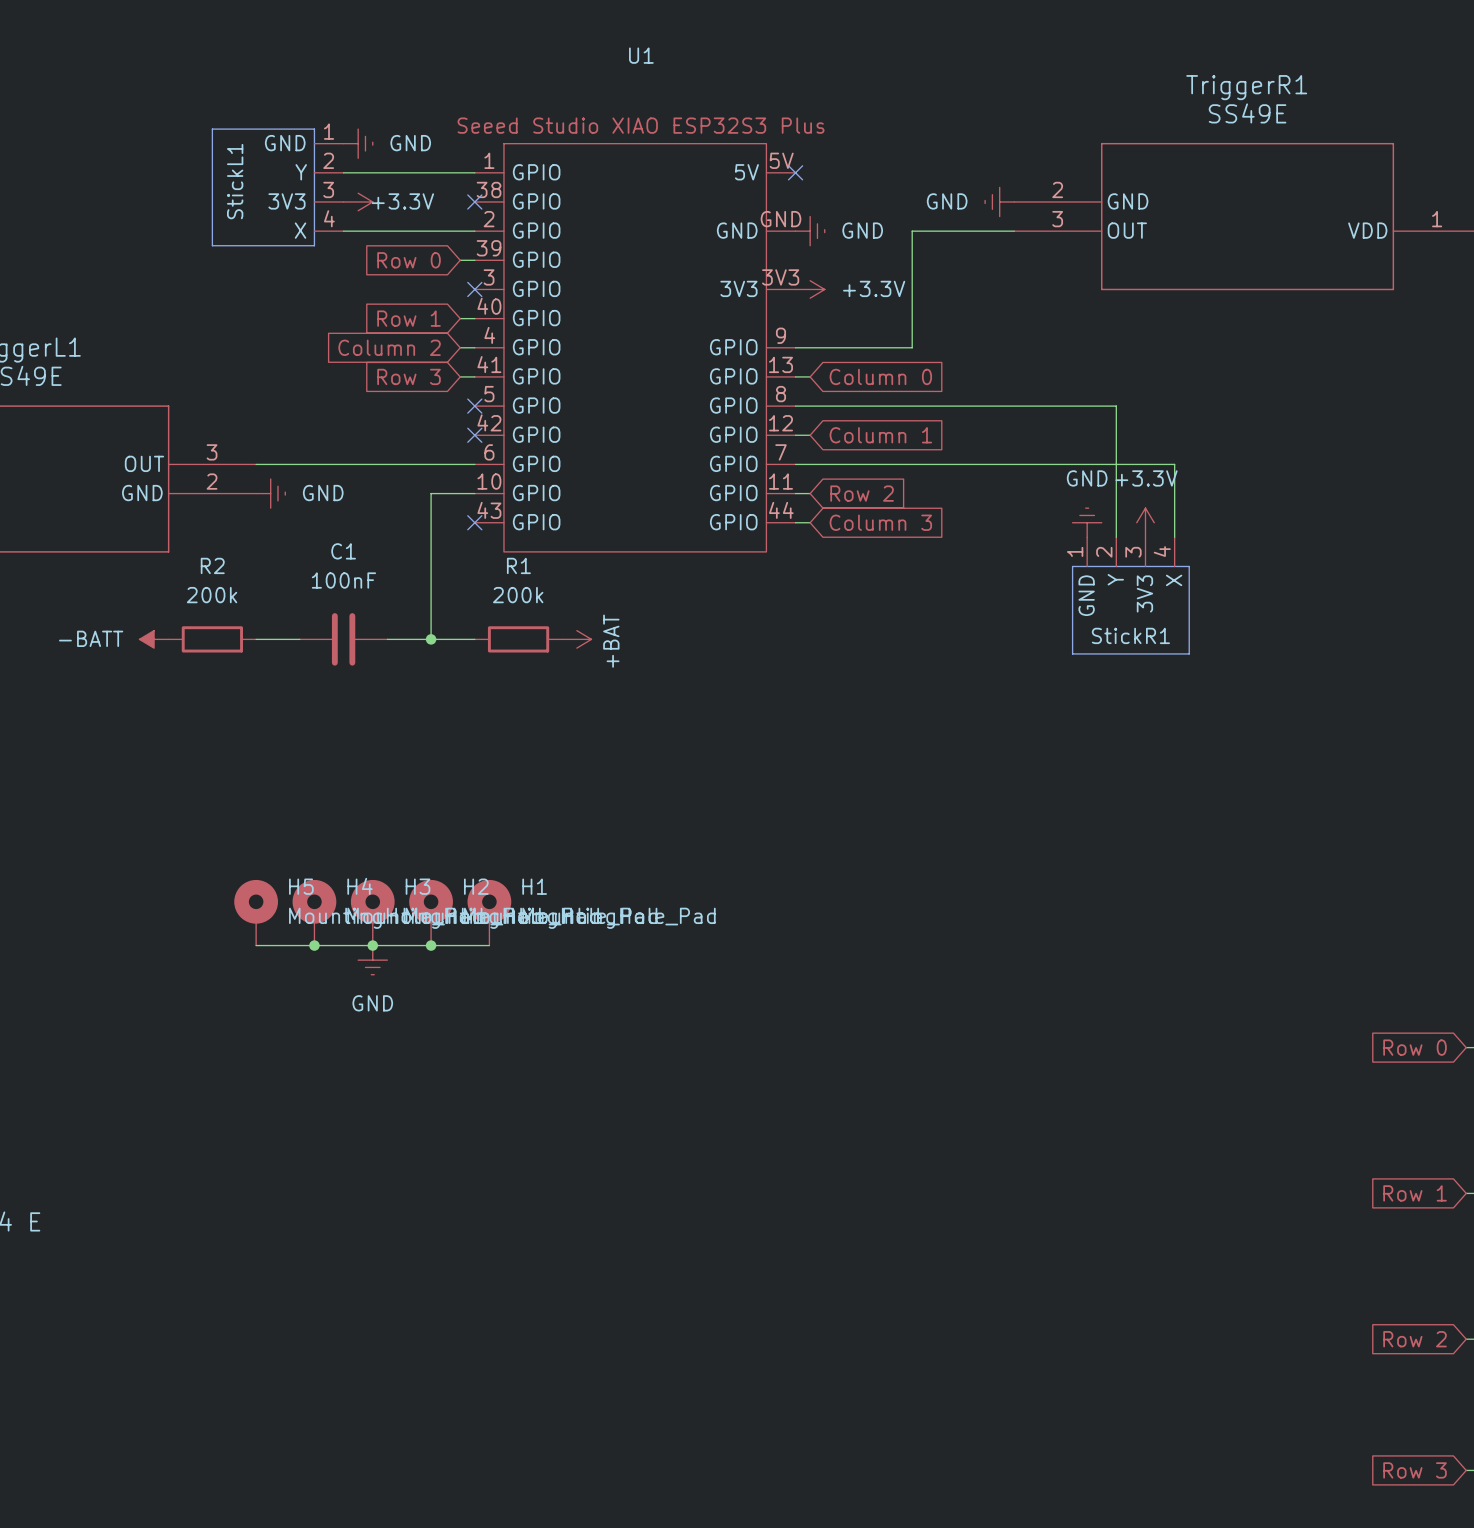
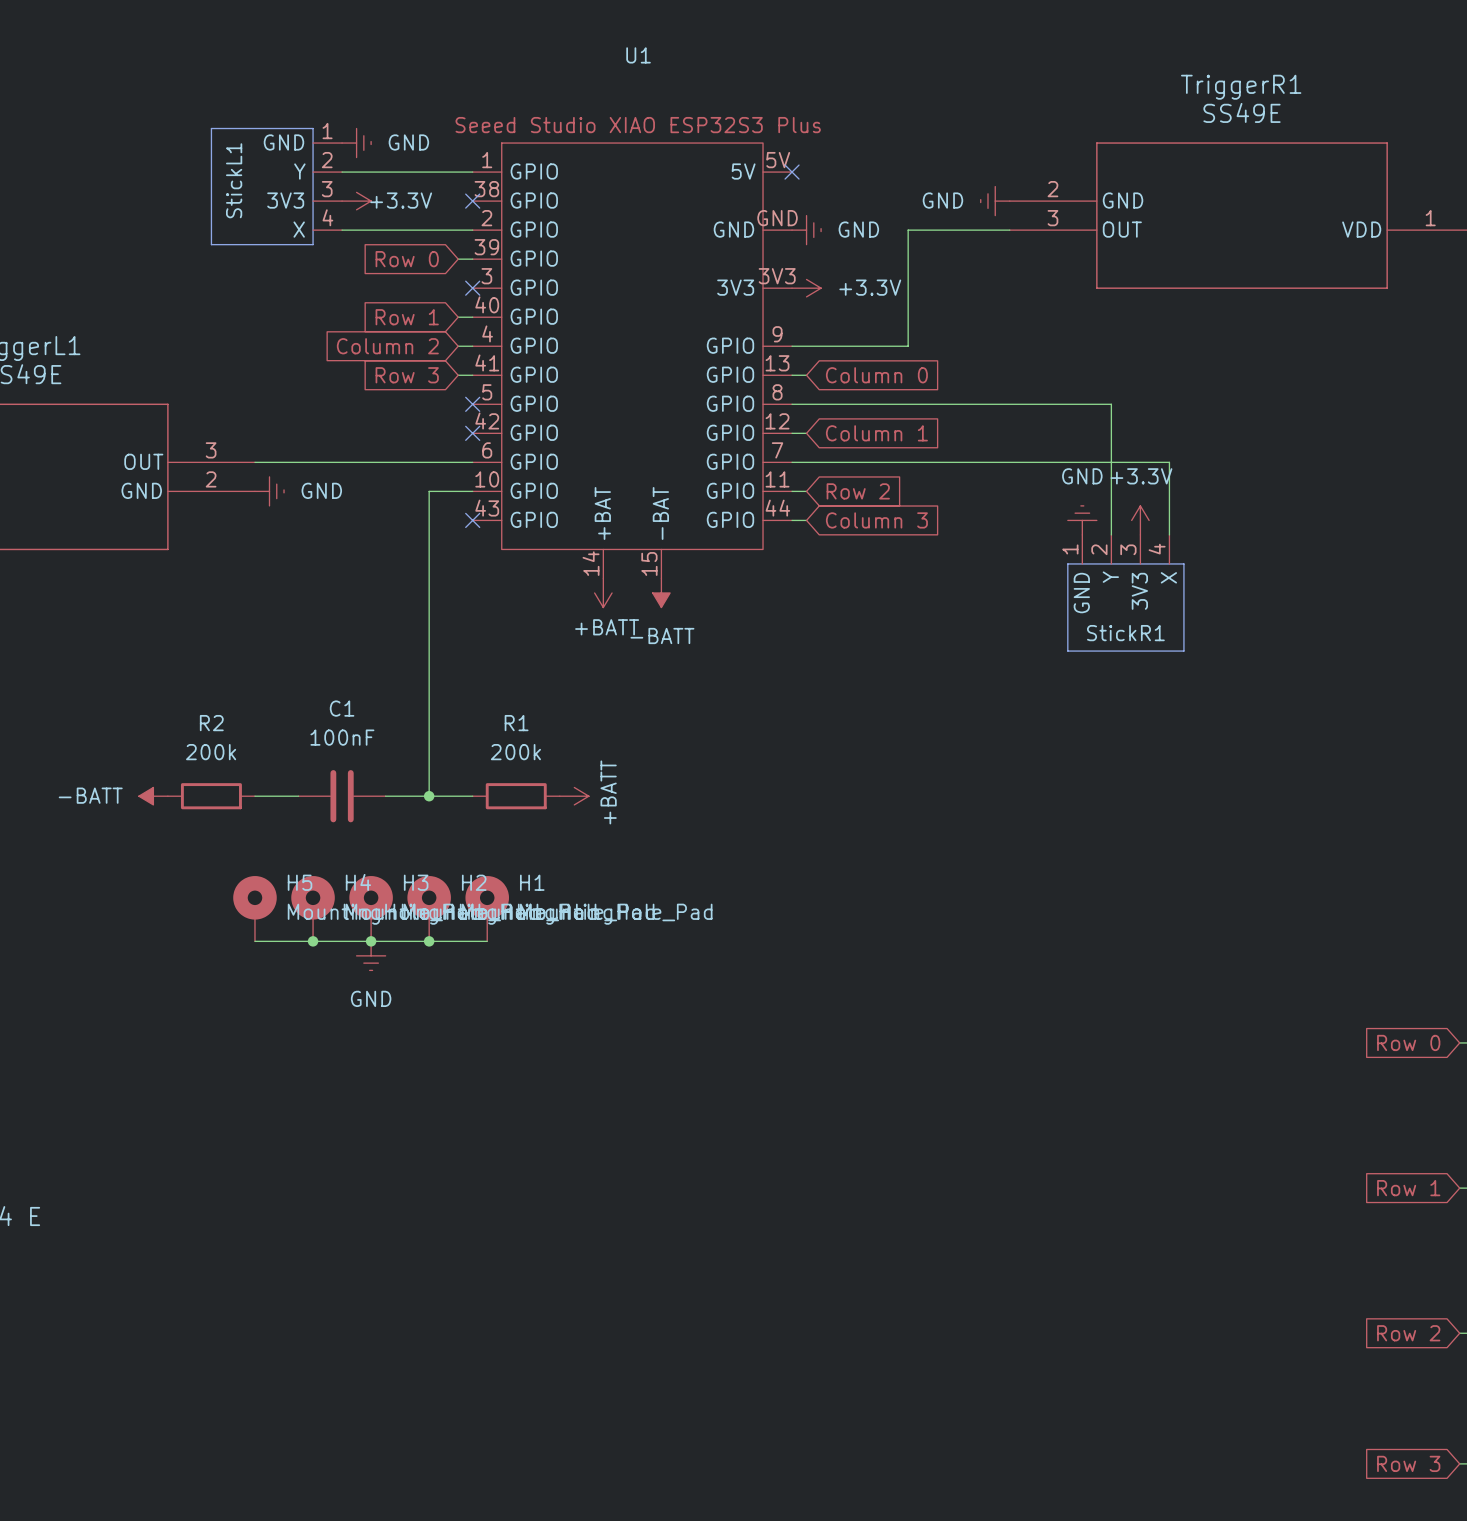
U1 symbol: [474, 143, 796, 552] -> [472, 143, 793, 579]
power symbol: none -> +BATT (603, 592)
power symbol: none -> -BATT (661, 592)
power symbol position: -BATT (154, 639) -> -BATT (153, 796)
R2 position: (212, 639) -> (211, 796)
wire: (256, 639) (299, 639) -> (254, 796) (298, 796)
C1 position: (343, 639) -> (342, 796)
wire: (387, 639) (474, 639) -> (385, 796) (472, 796)
wire: none -> (429, 636) (429, 796)
junction: (431, 639) -> none
R1 position: (518, 639) -> (516, 796)
power symbol: +BAT (576, 639) -> none
junction: none -> (429, 796)
power symbol: none -> +BATT (574, 796)

